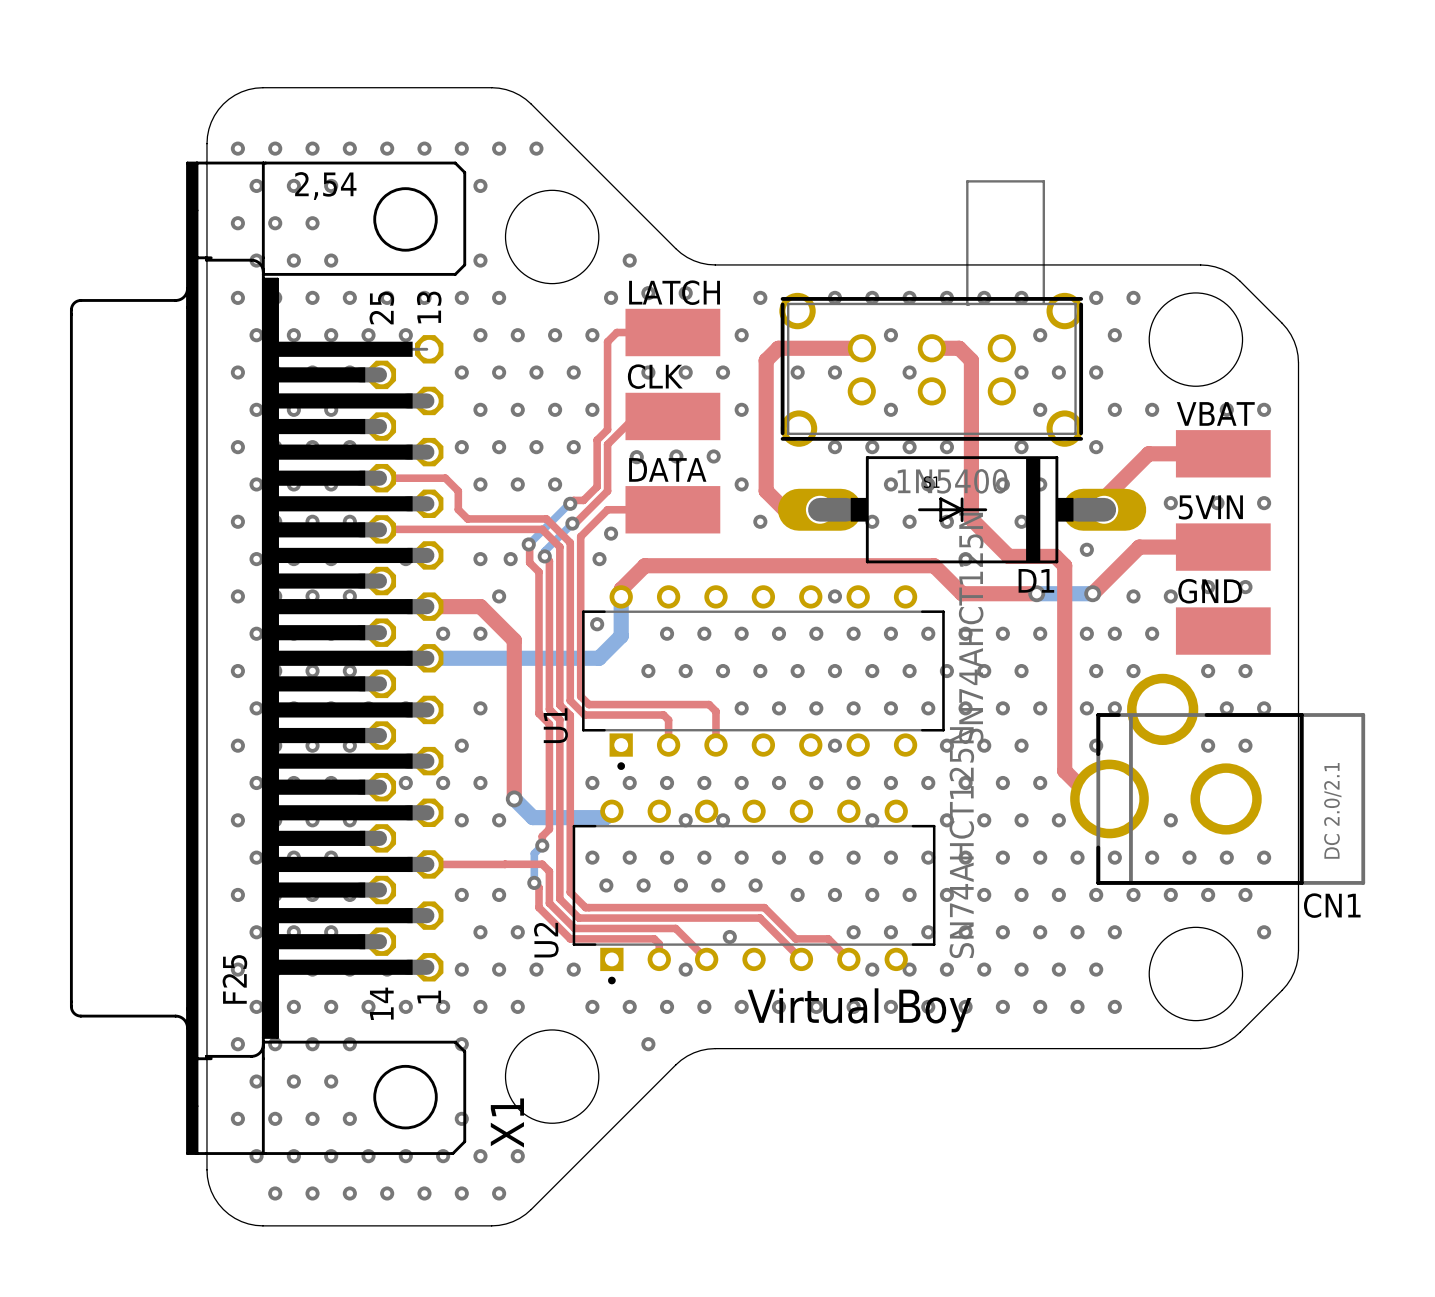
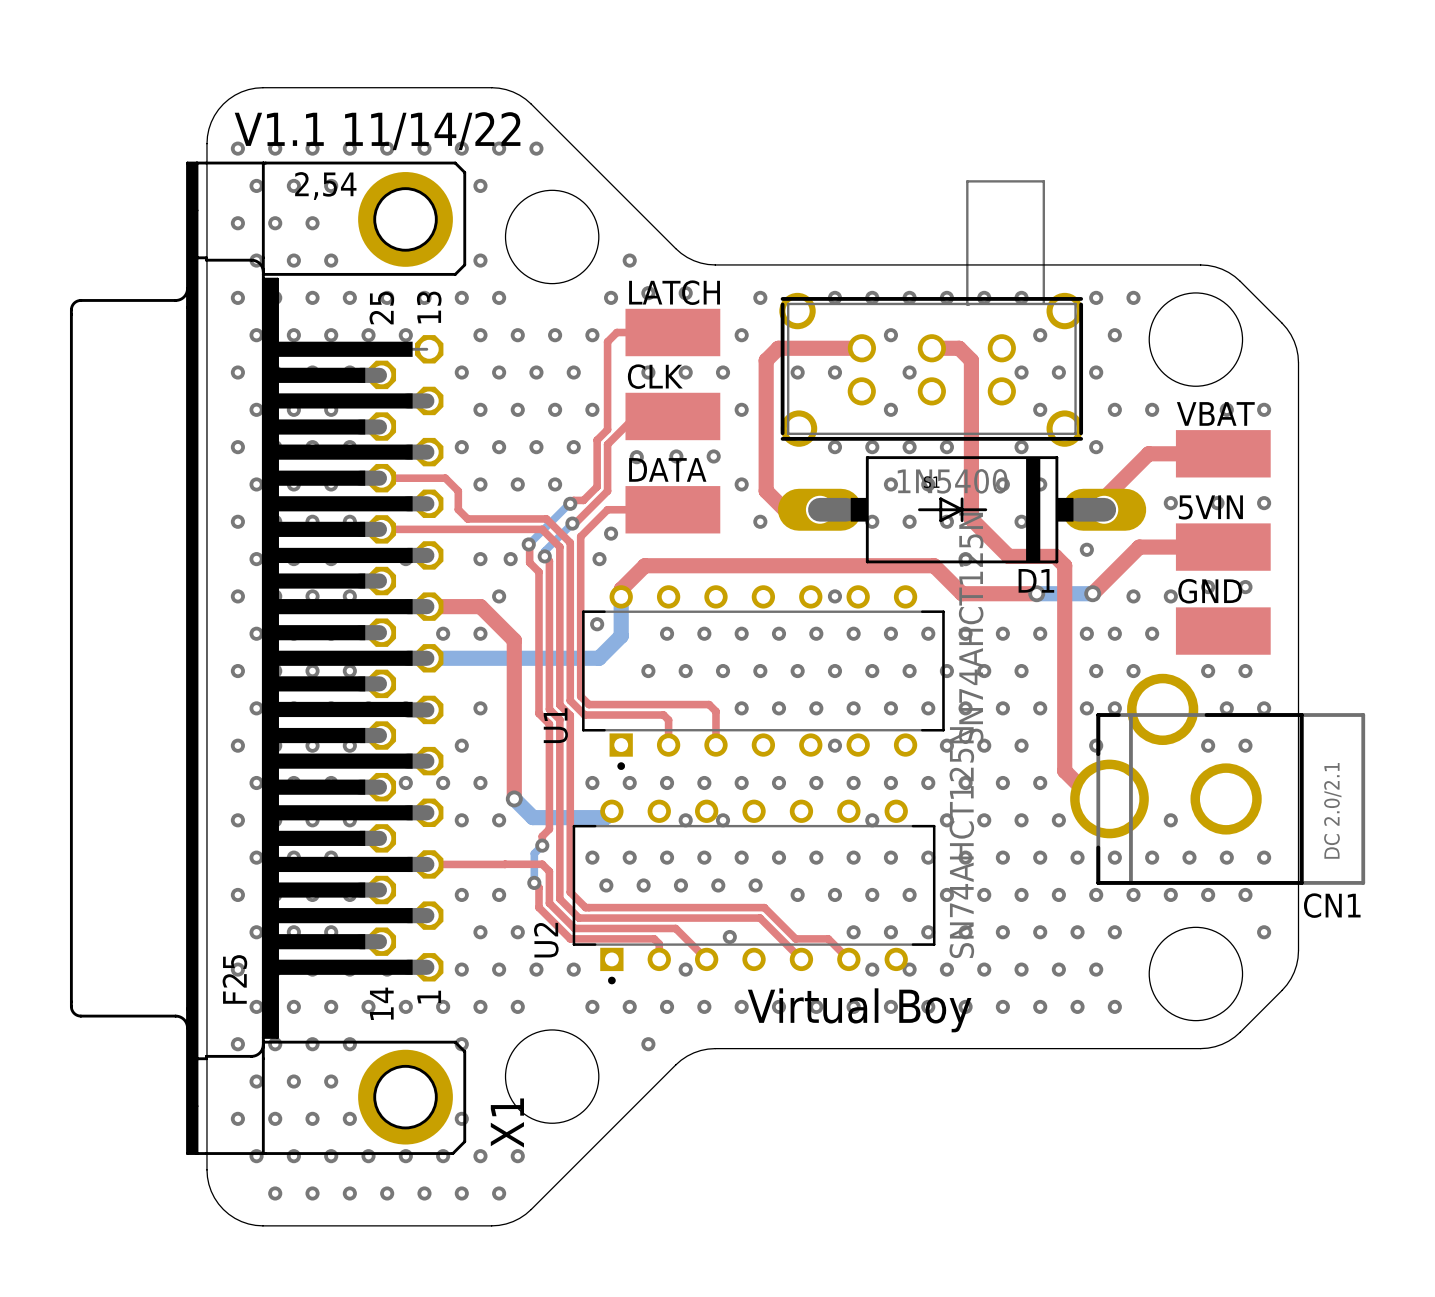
text: none -> V1.1 11/14/22 (377, 131)
X1 footprint: [69, 161, 467, 1155] -> [69, 161, 467, 1155]

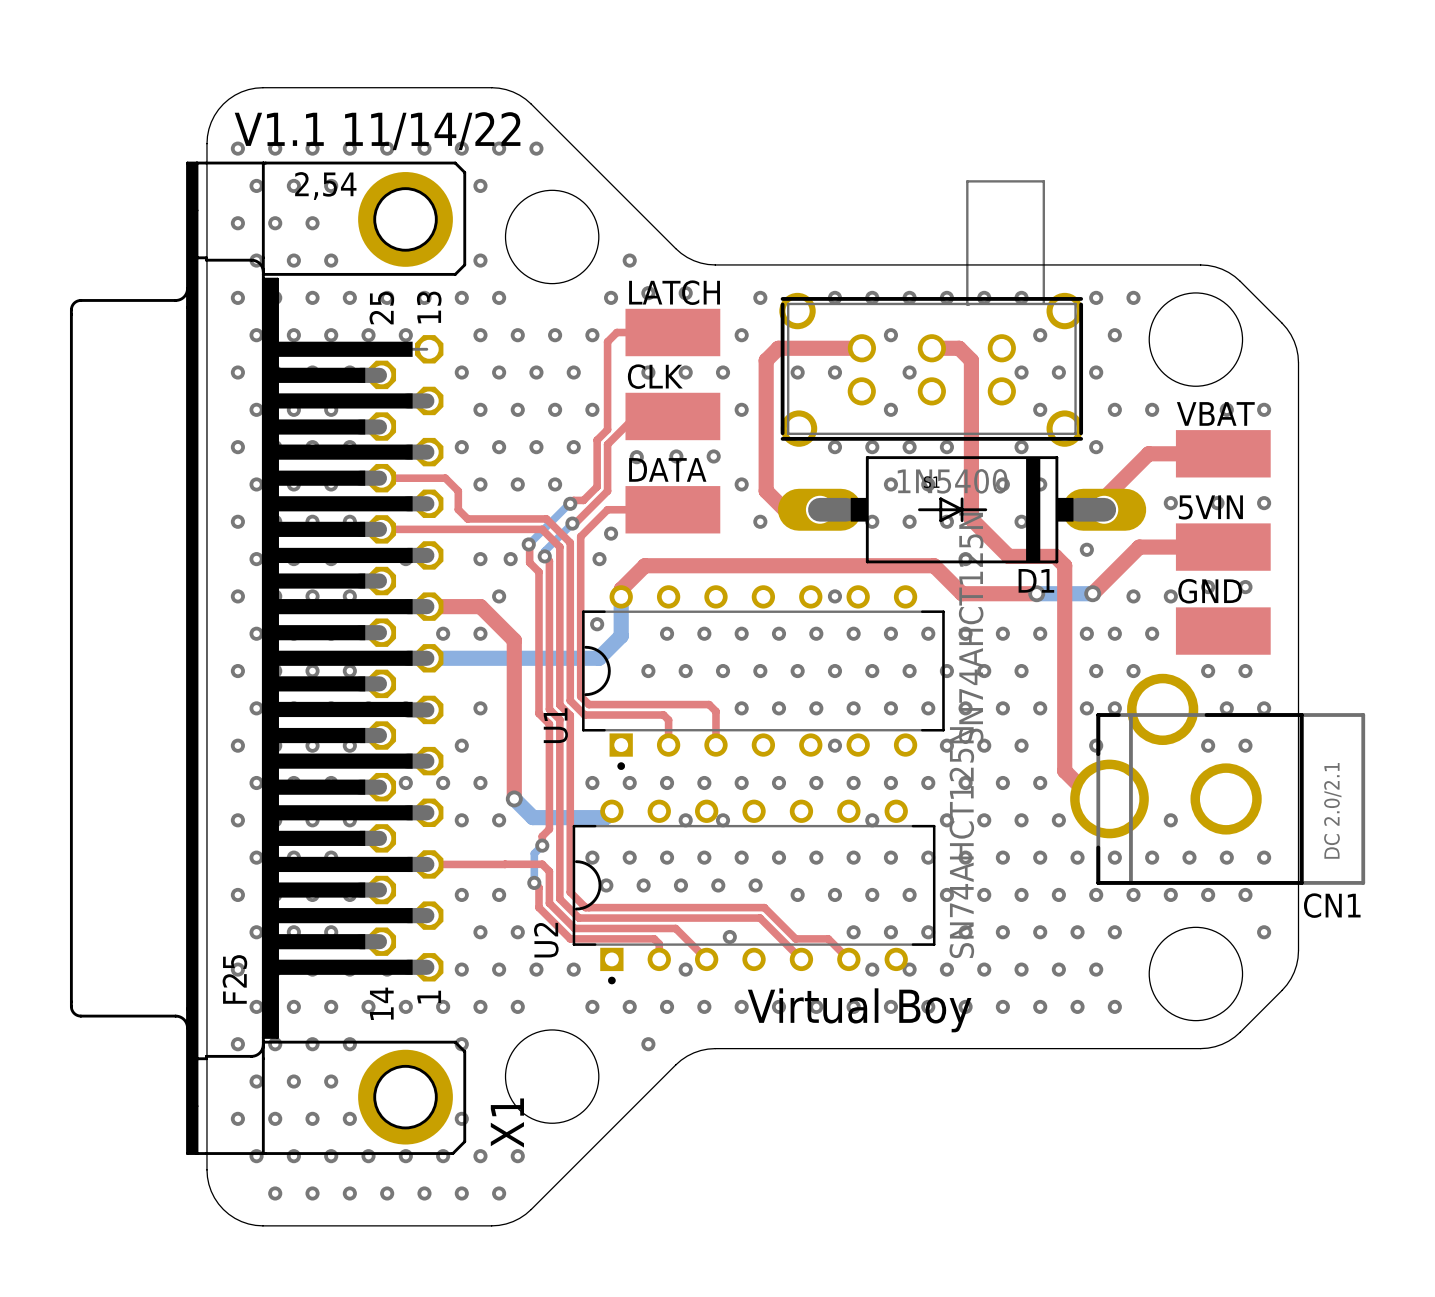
U1 footprint: [582, 585, 945, 770] -> [582, 585, 945, 770]
U2 footprint: [572, 799, 936, 985] -> [572, 799, 936, 985]

